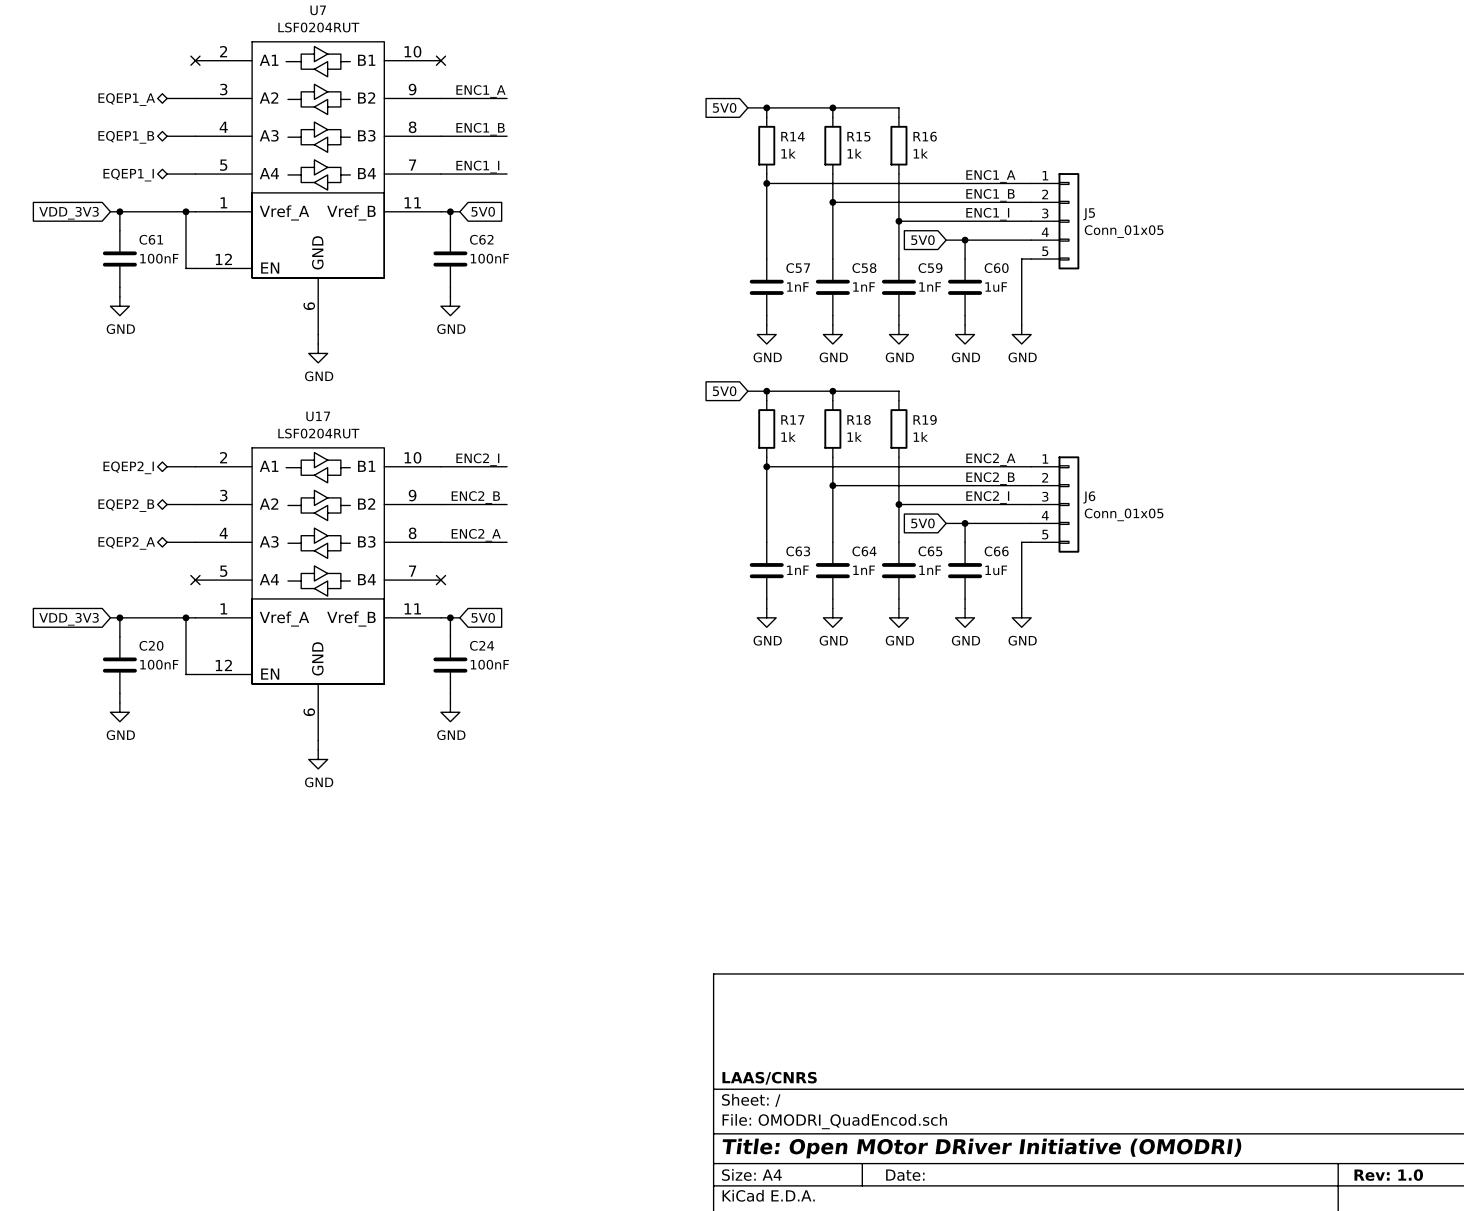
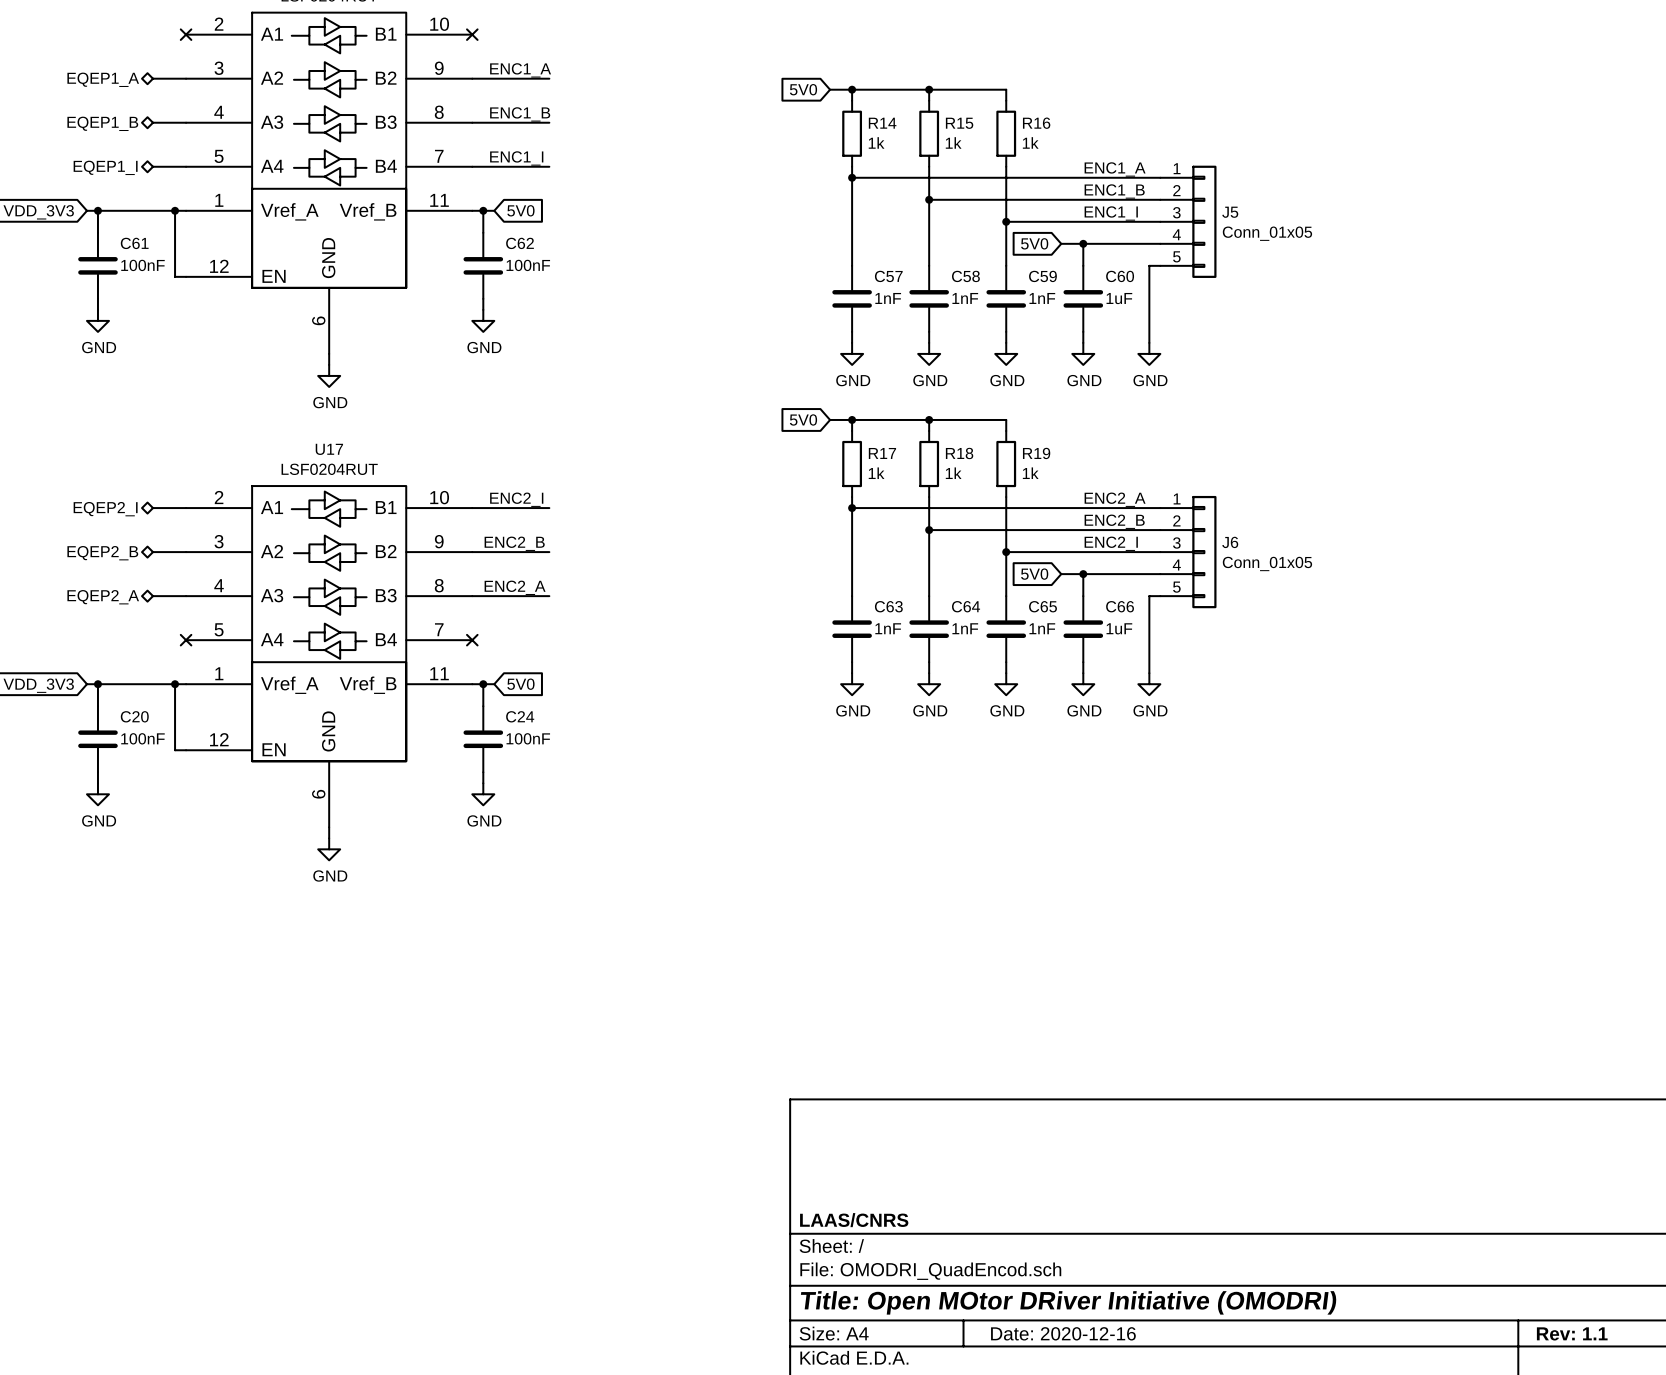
title block: Date: (905, 1175) -> Date: 2020-12-16 (1063, 1333)
title block: Rev: 1.0 (1388, 1175) -> Rev: 1.1 (1572, 1333)

